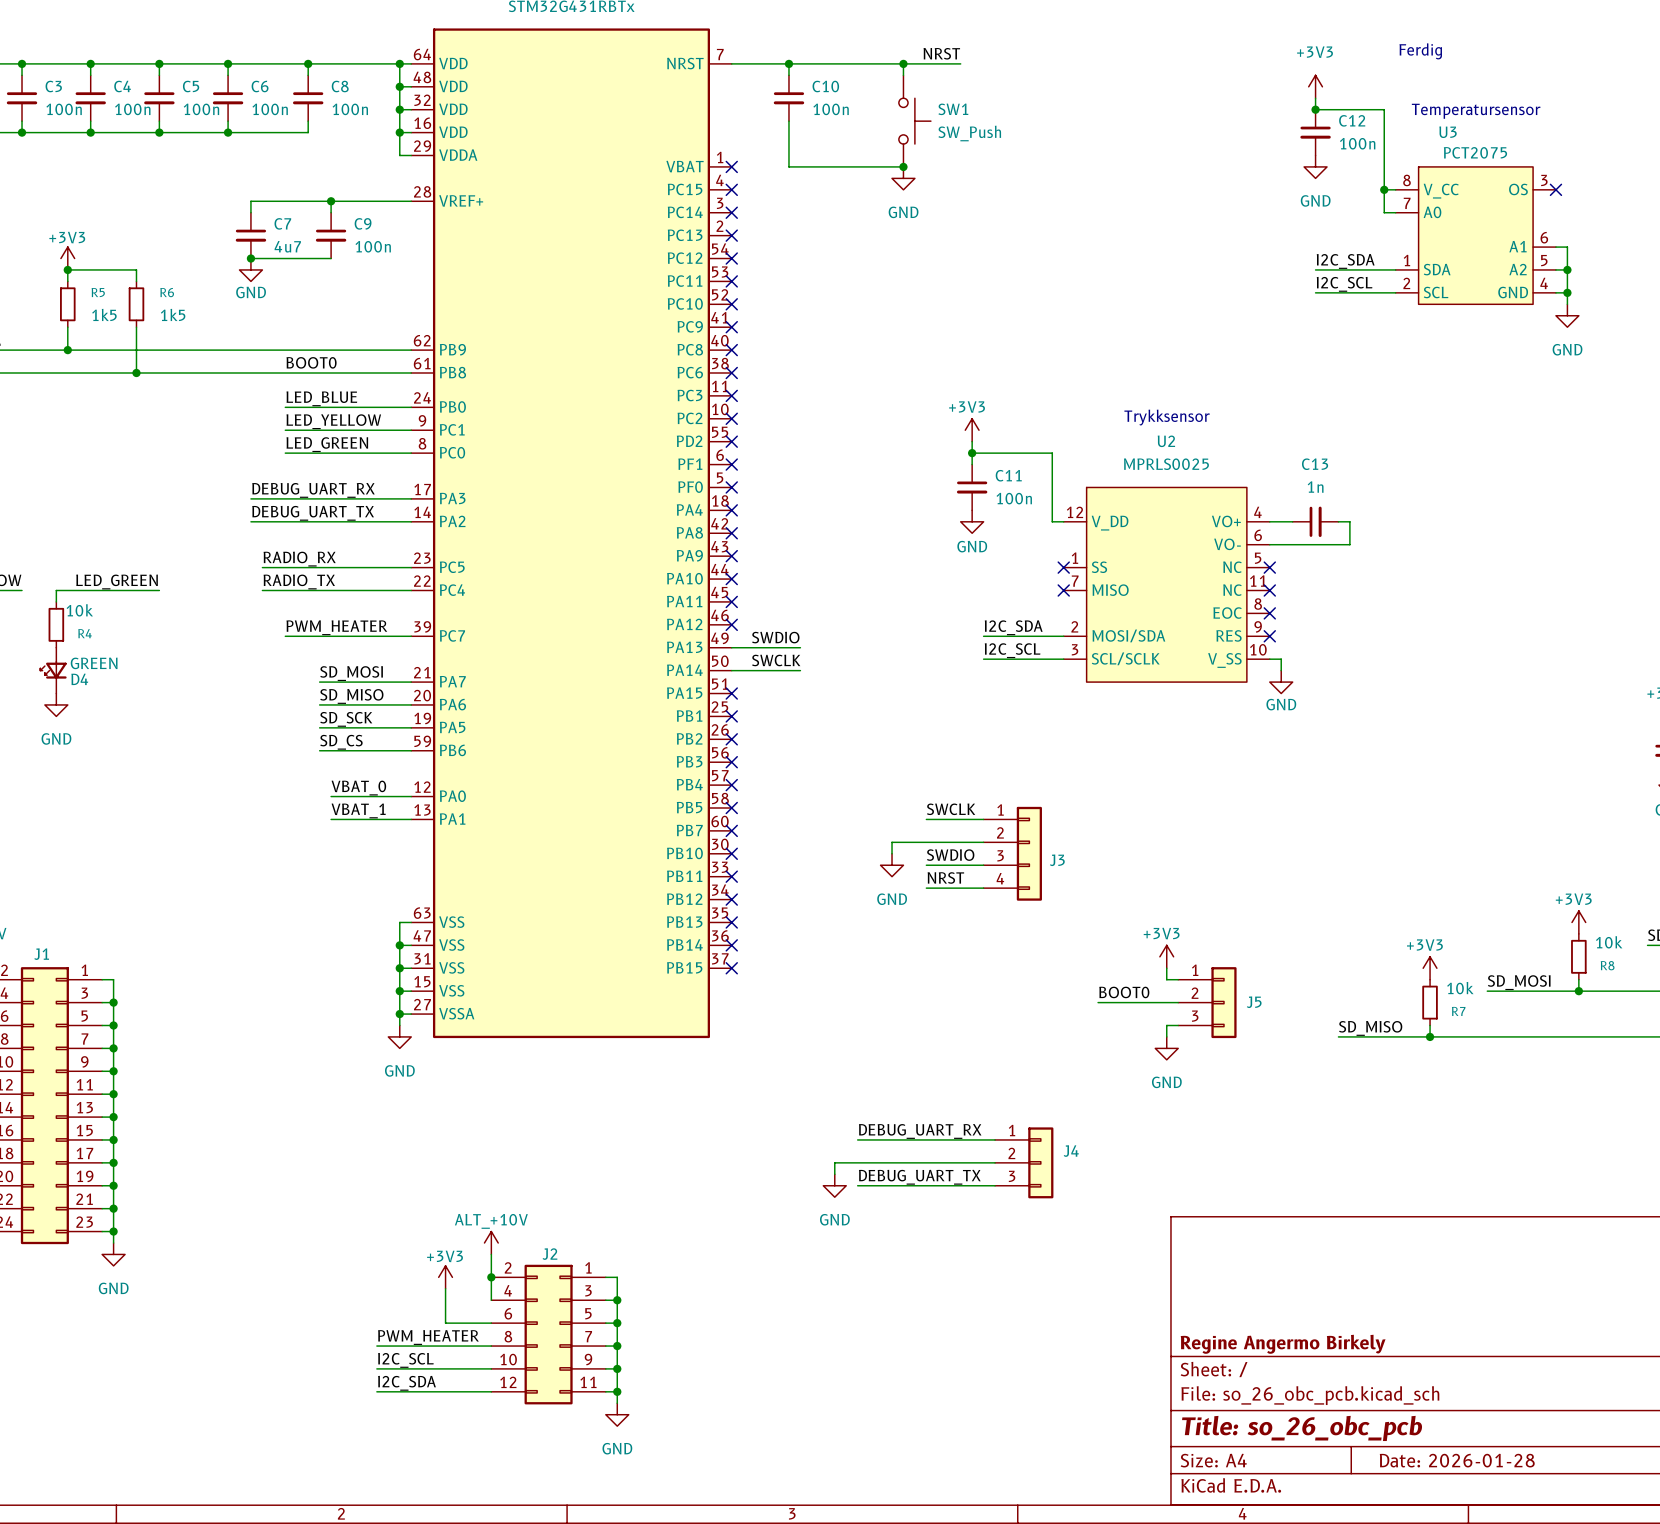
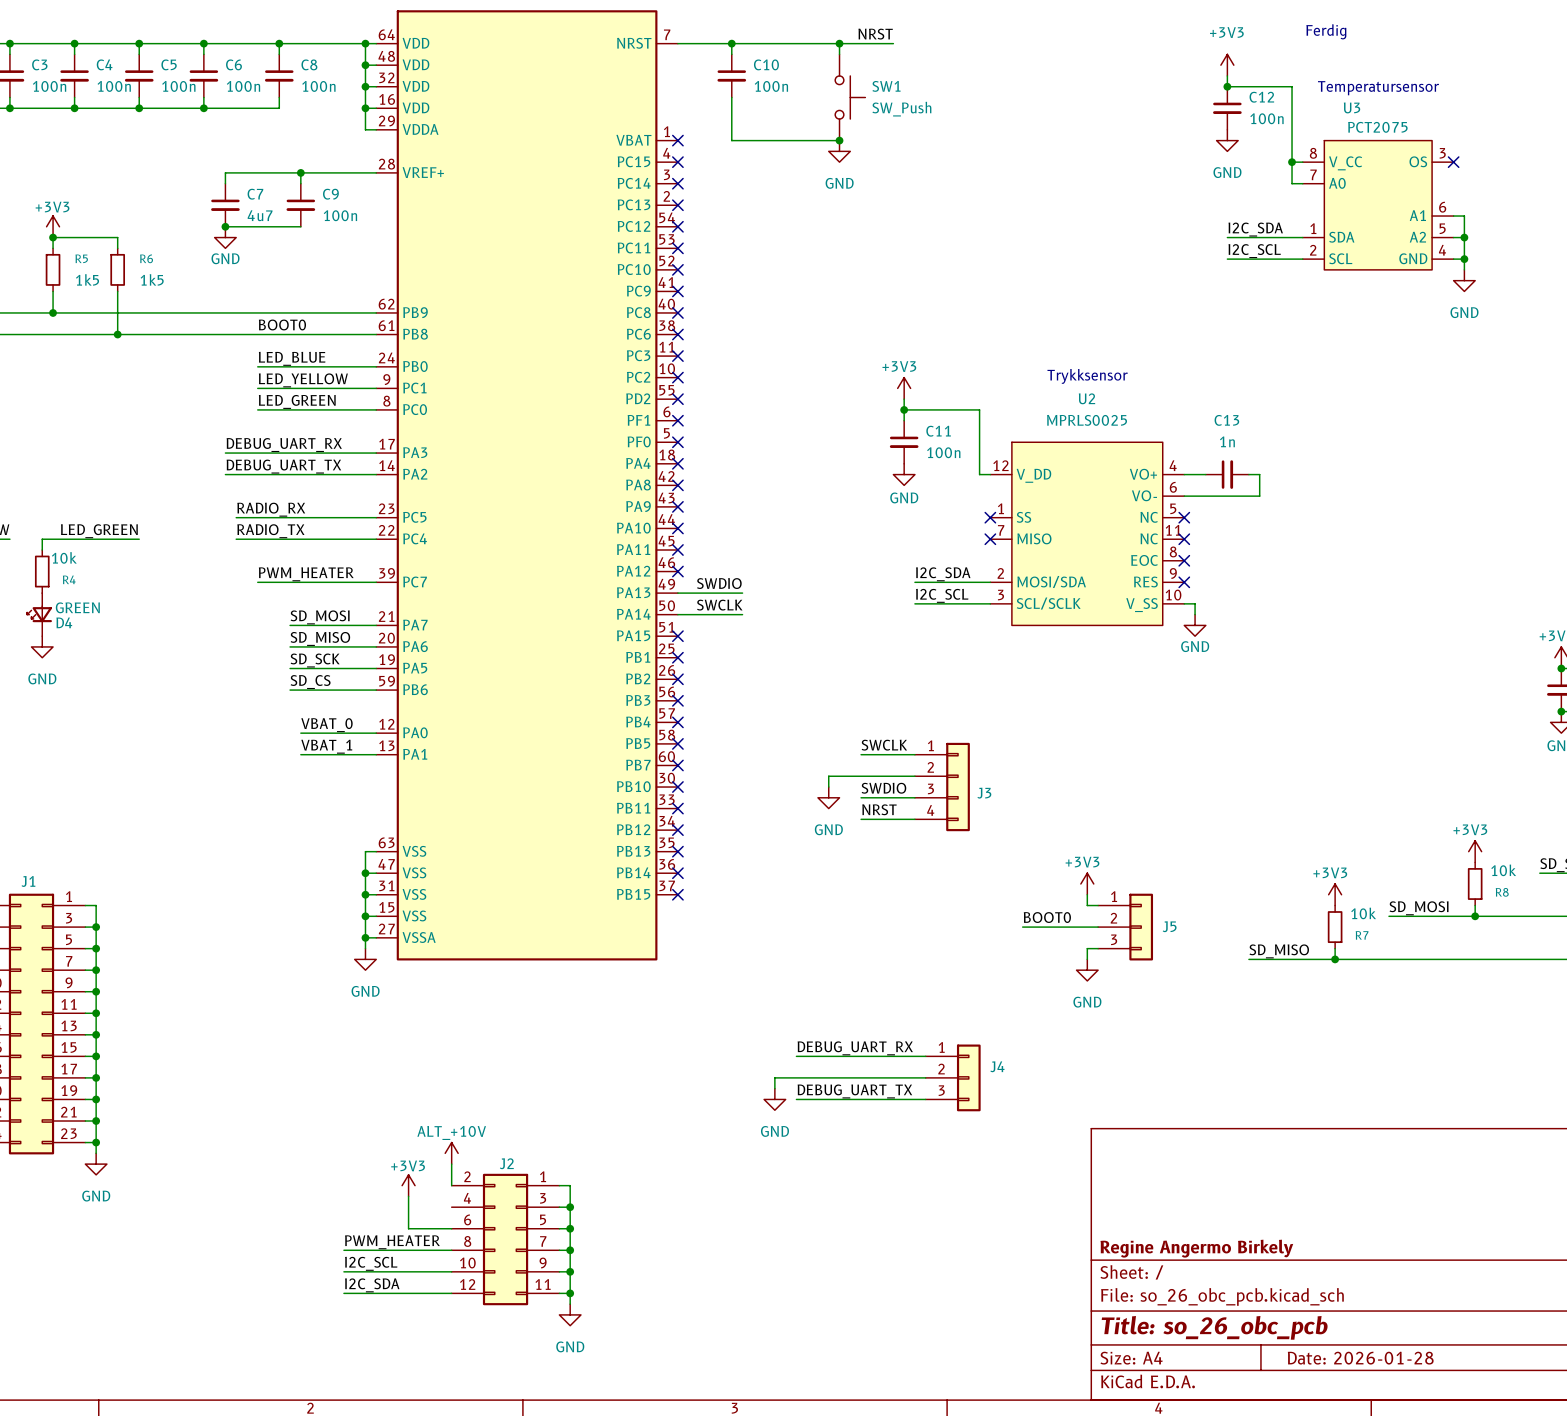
wire: (491, 1277) (491, 1300) -> none
junction: (491, 1277) -> none

